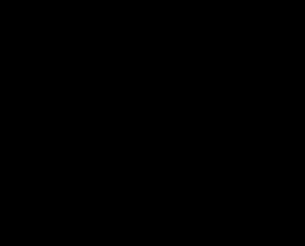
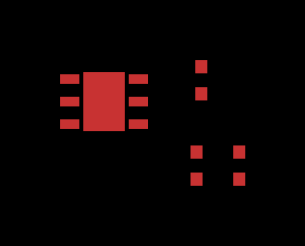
part: none -> (201, 80)
part: none -> (104, 101)
part: none -> (196, 165)
part: none -> (239, 165)

